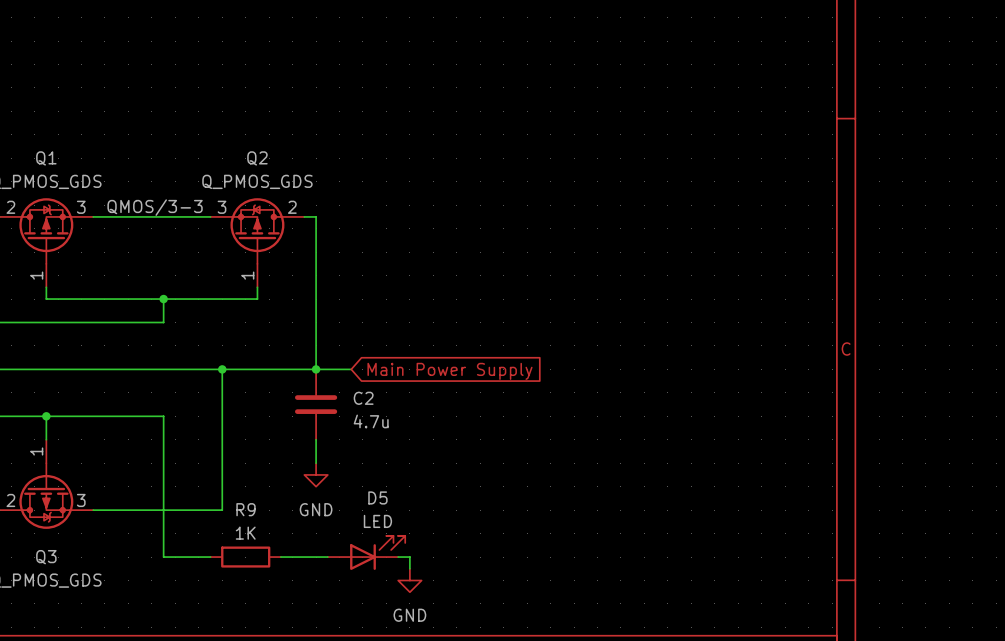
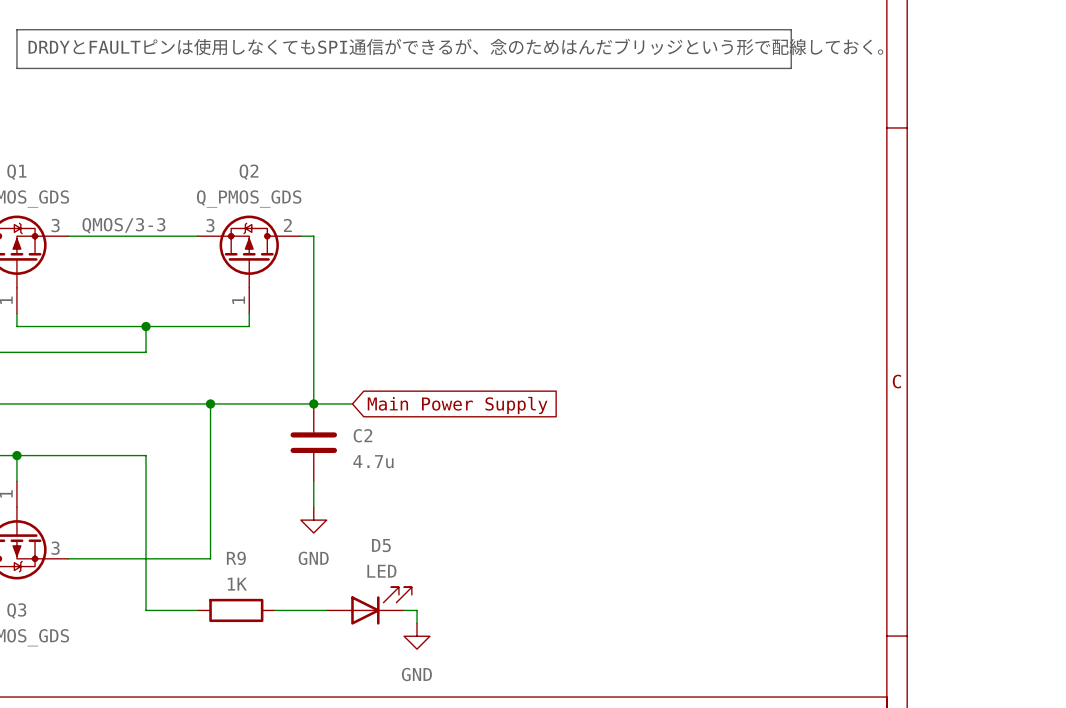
line: none -> (16, 29) (791, 29) (791, 68) (16, 68) (16, 29)
text: none -> DRDYとFAULTピンは使用しなくてもSPI通信ができるが、念のためはんだブリッジという形で配線しておく。 (455, 46)

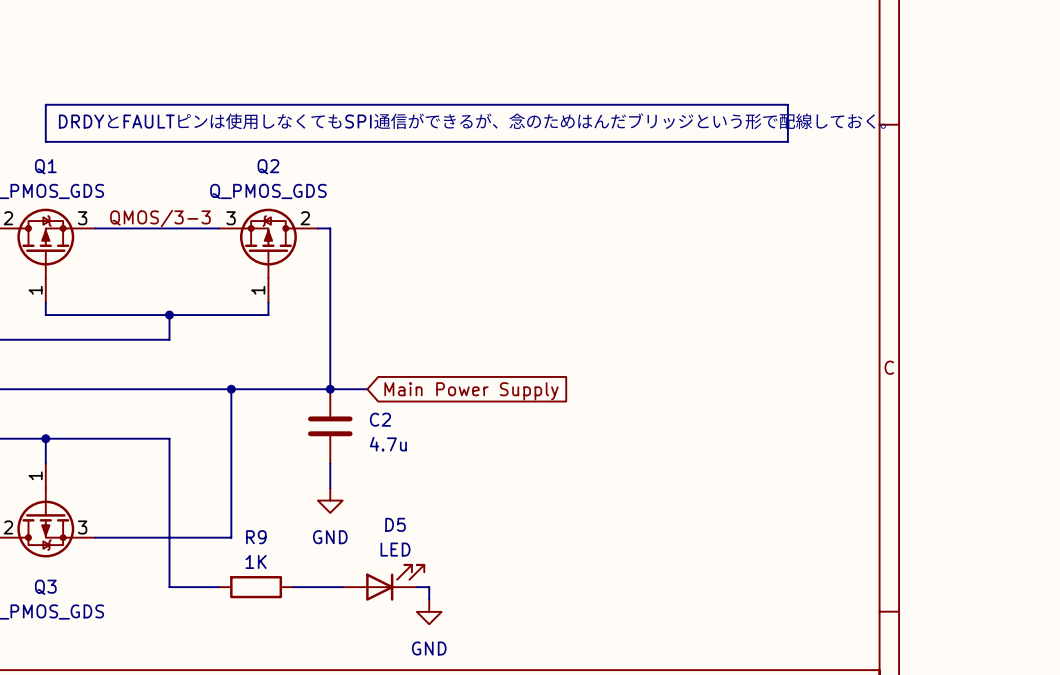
line: (16, 29) (791, 29) (791, 68) (16, 68) (16, 29) -> (45, 104) (787, 104) (787, 141) (45, 141) (45, 104)
text position: DRDYとFAULTピンは使用しなくてもSPI通信ができるが、念のためはんだブリッジという形で配線しておく。 (455, 46) -> DRDYとFAULTピンは使用しなくてもSPI通信ができるが、念のためはんだブリッジという形で配線しておく。 (472, 121)

